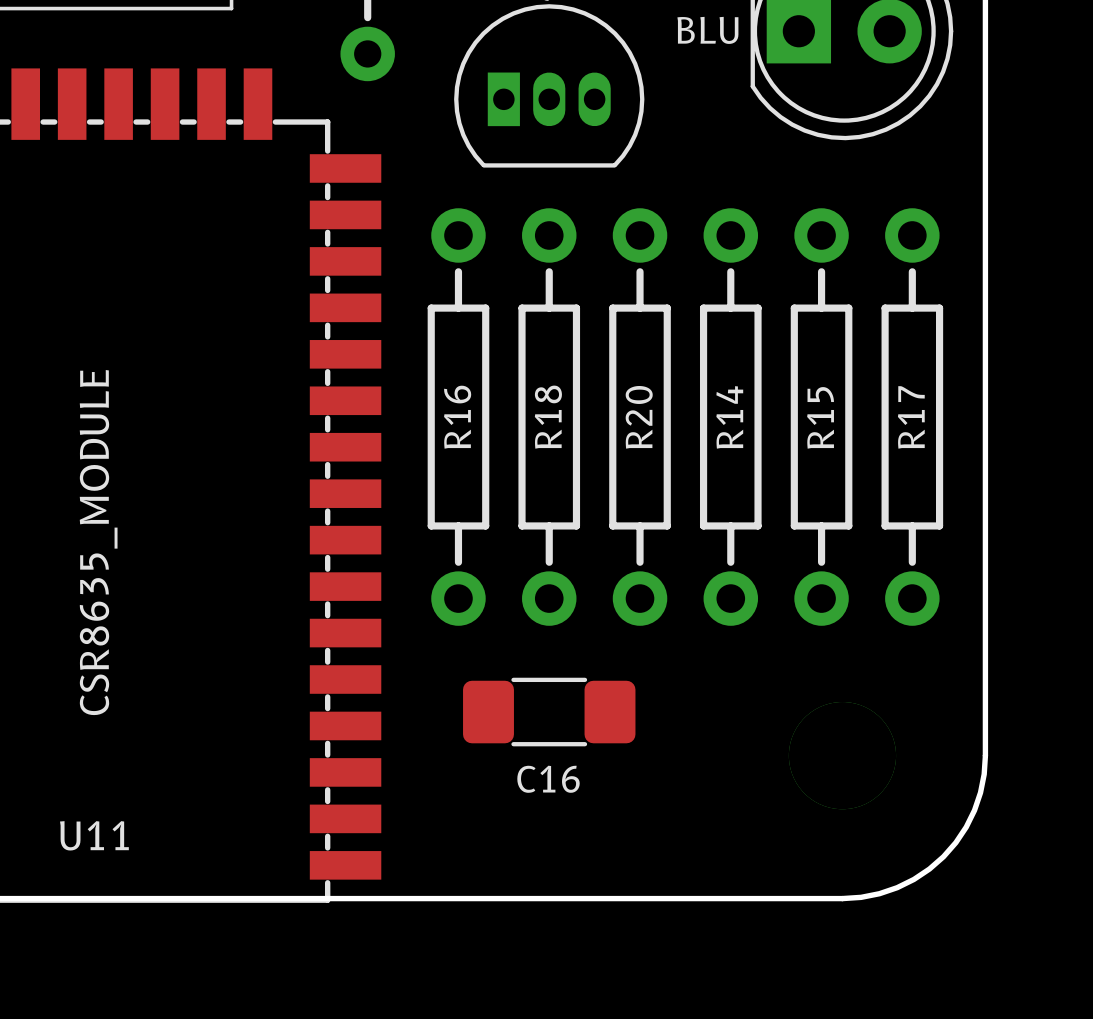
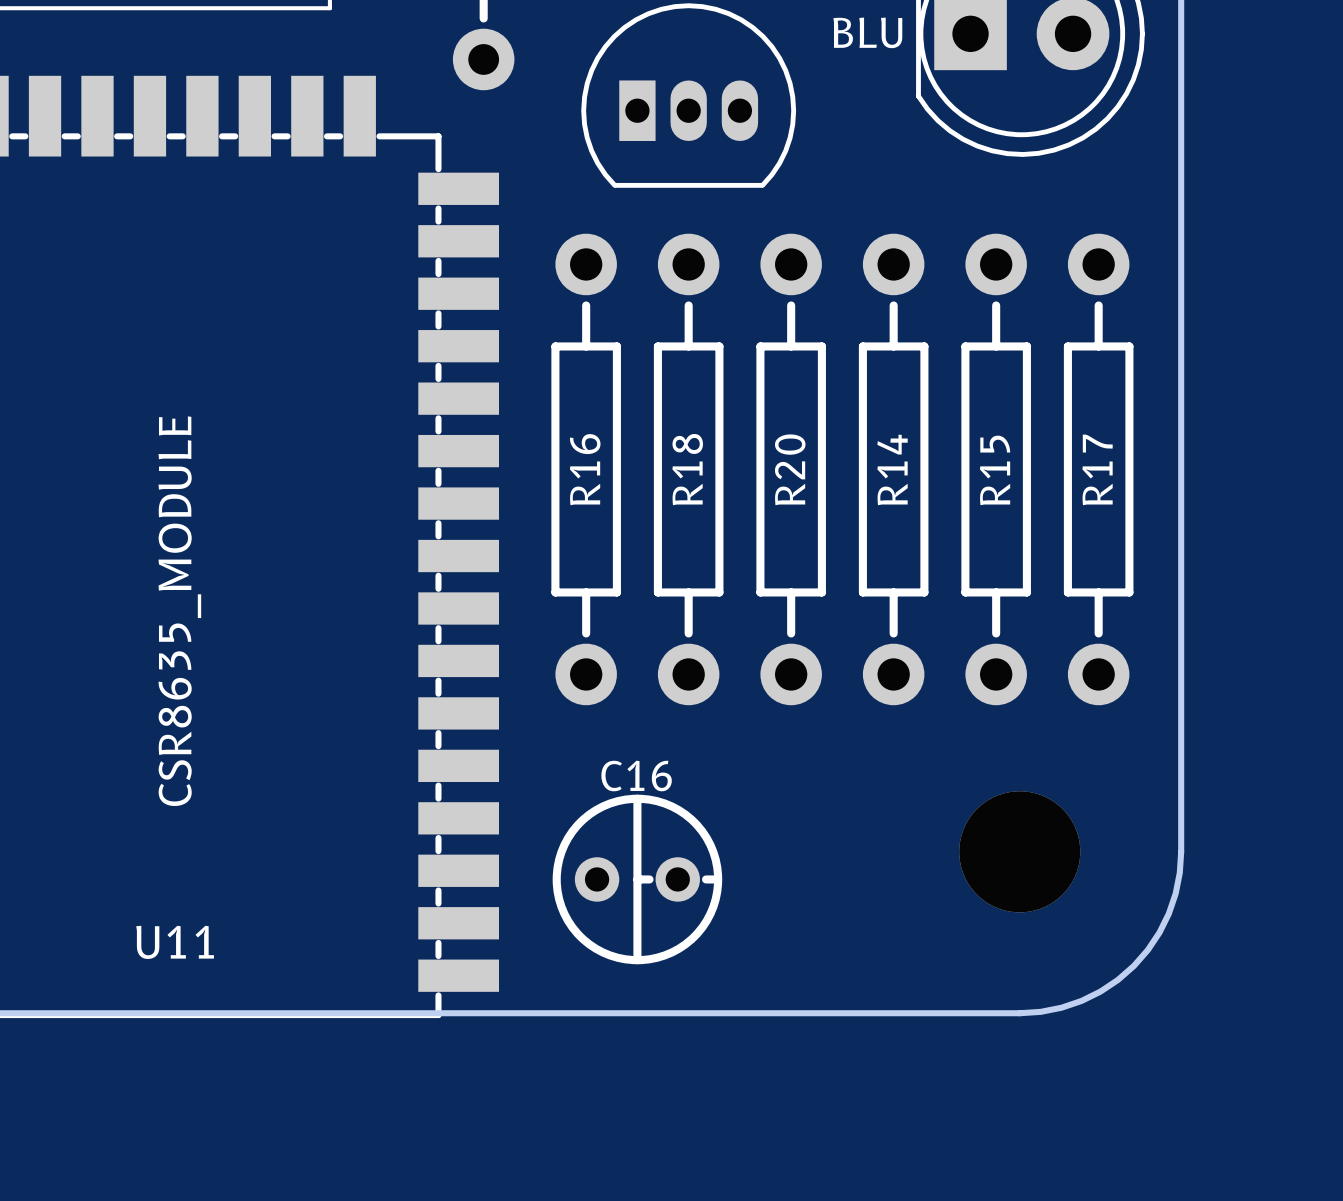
C16 footprint: [463, 677, 636, 747] -> [552, 794, 723, 965]
C16 name position: C16 (548, 779) -> C16 (636, 776)

